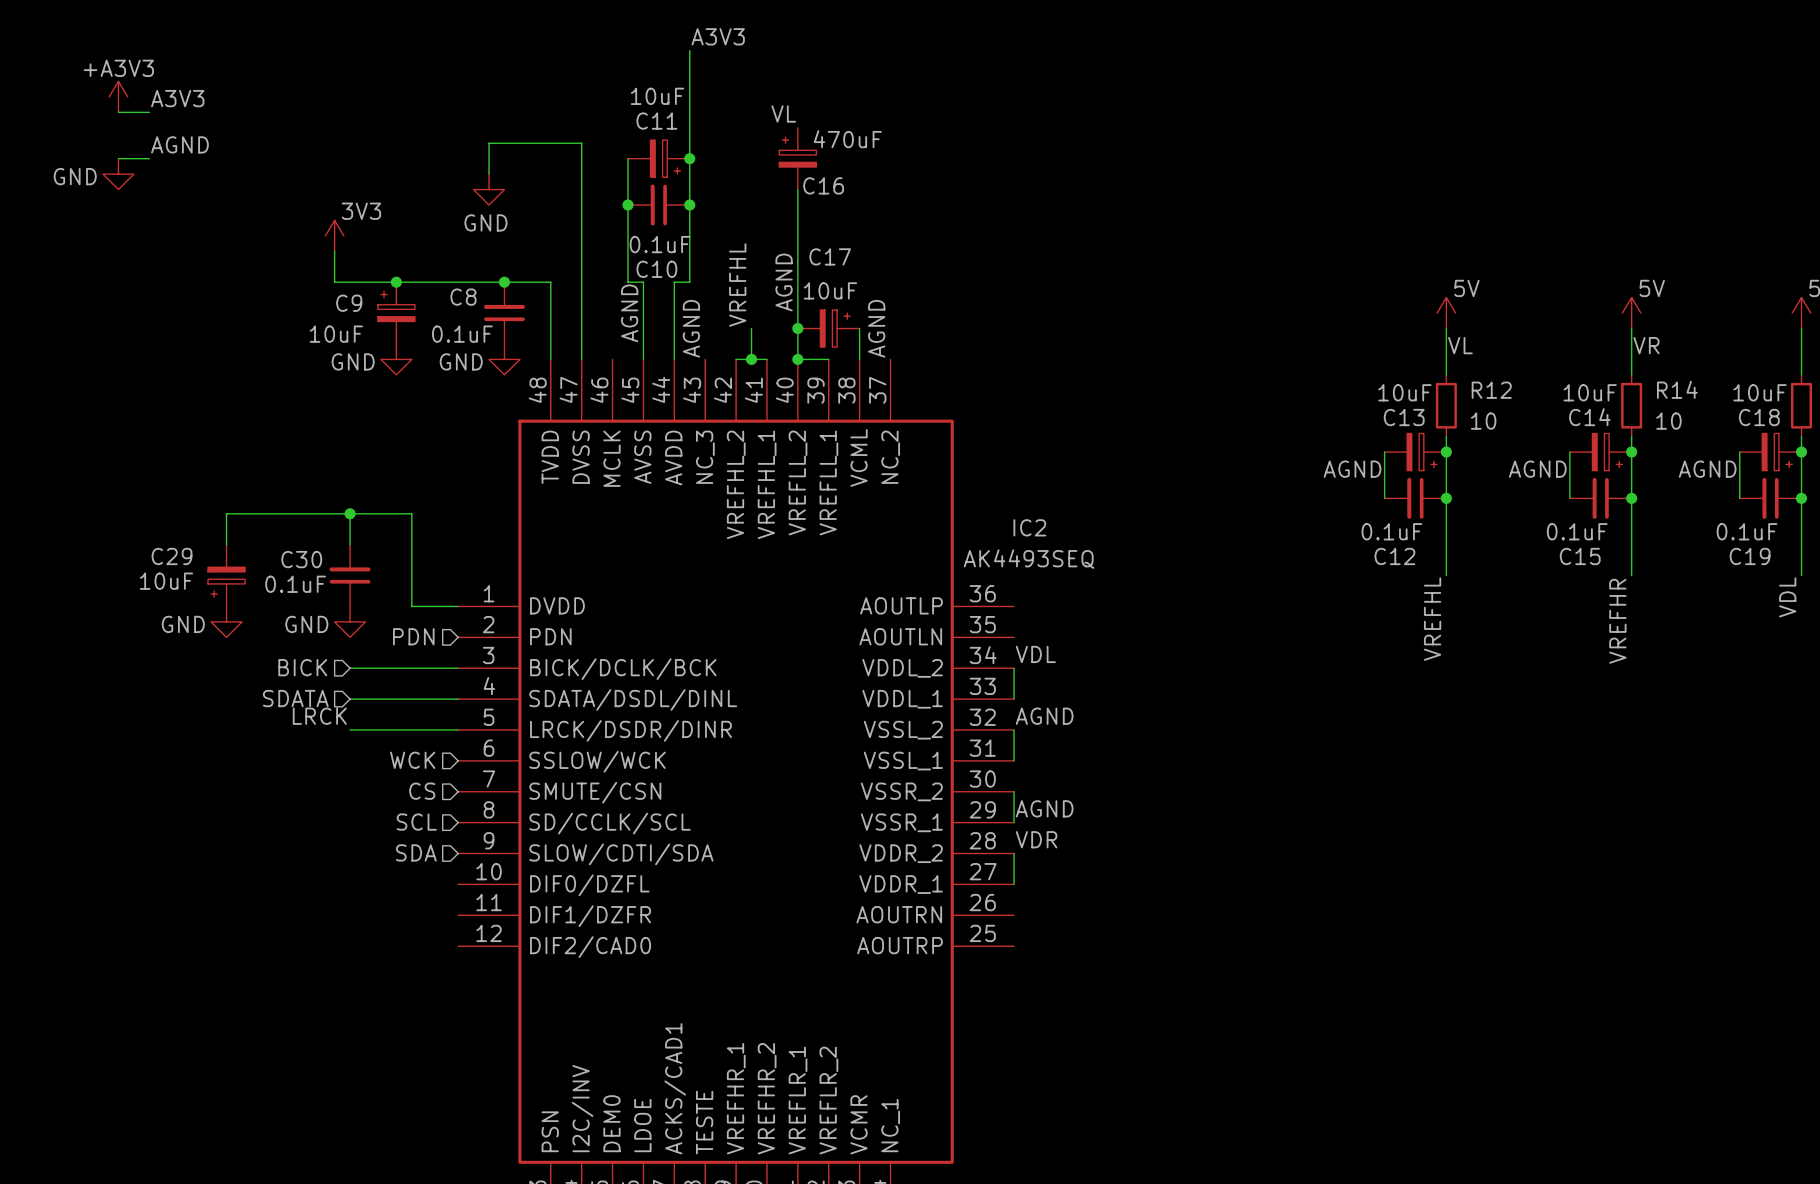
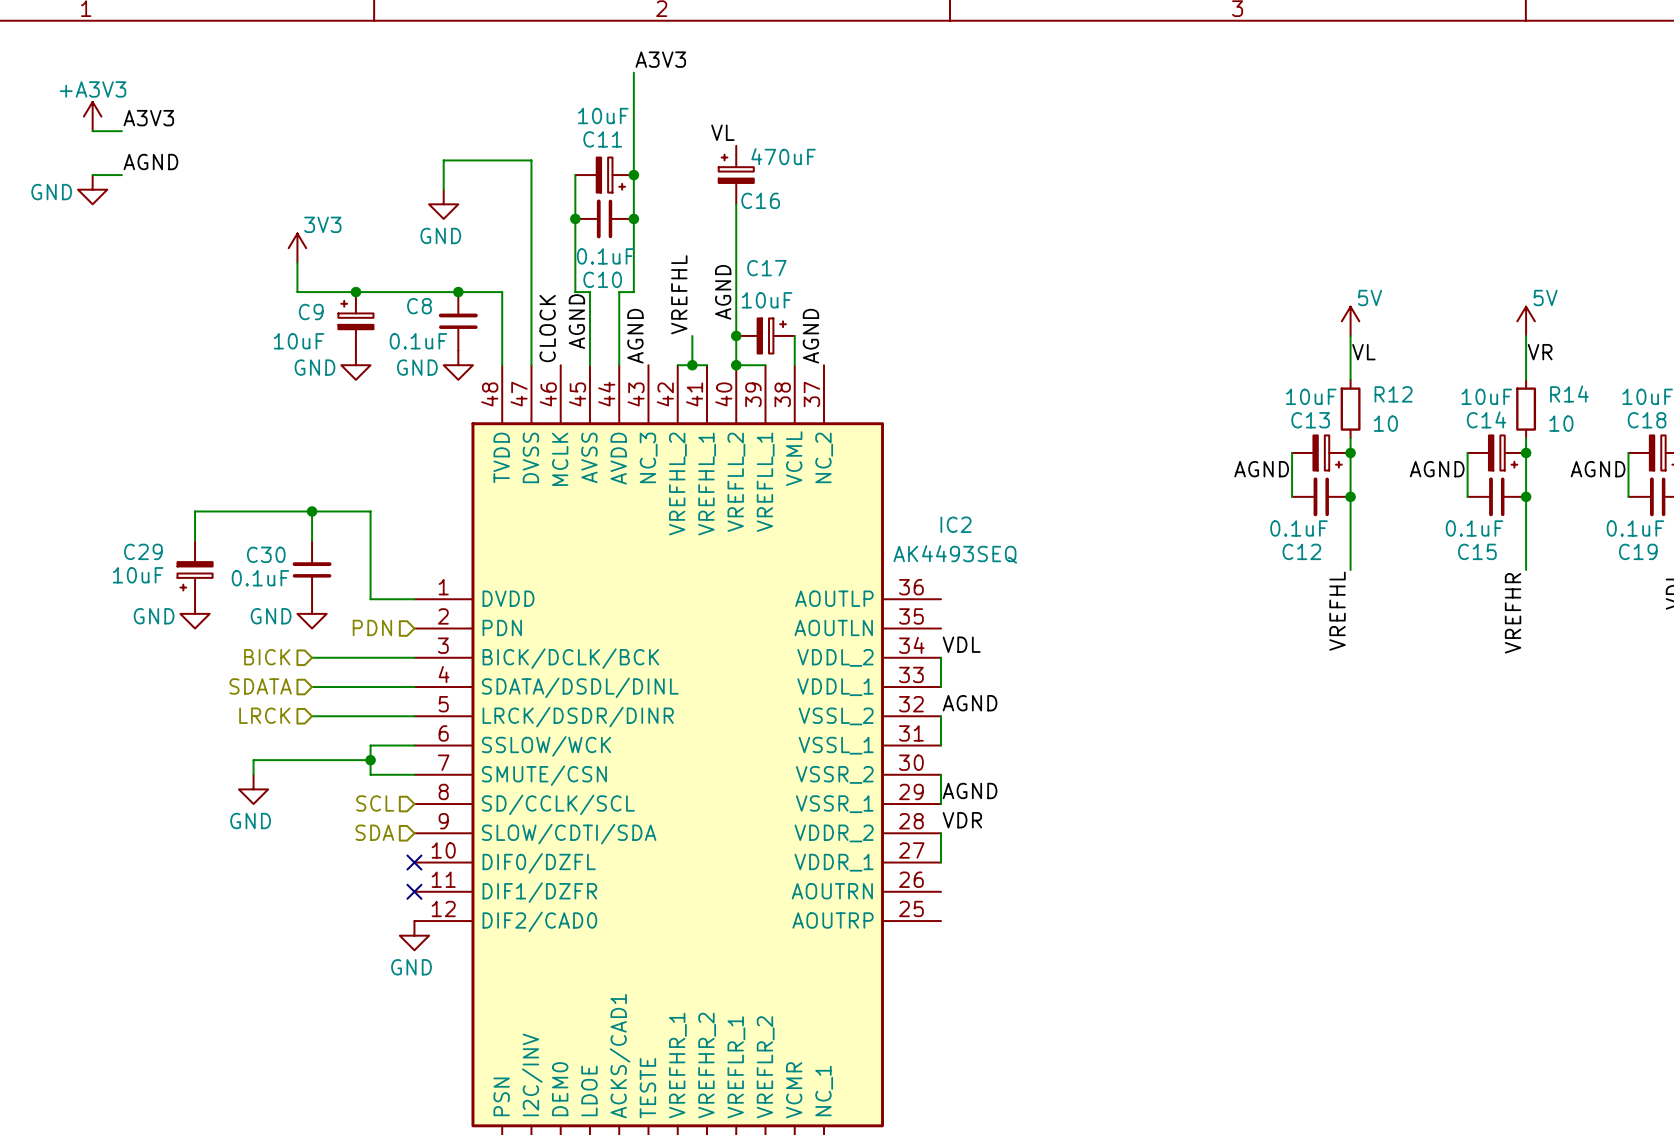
label: none -> CLOCK (547, 328)
label: LRCK (319, 716) -> none
hierarchical label: none -> LRCK (264, 715)
hierarchical label: WCK (412, 760) -> none
wire: none -> (414, 745) (370, 745) (370, 774) (414, 774)
wire: none -> (370, 760) (253, 760) (253, 774)
junction: none -> (370, 760)
hierarchical label: CS (422, 791) -> none
power symbol: none -> GND (253, 789)
no-connect mark: none -> (414, 862)
no-connect mark: none -> (414, 891)
power symbol: none -> GND (414, 935)

